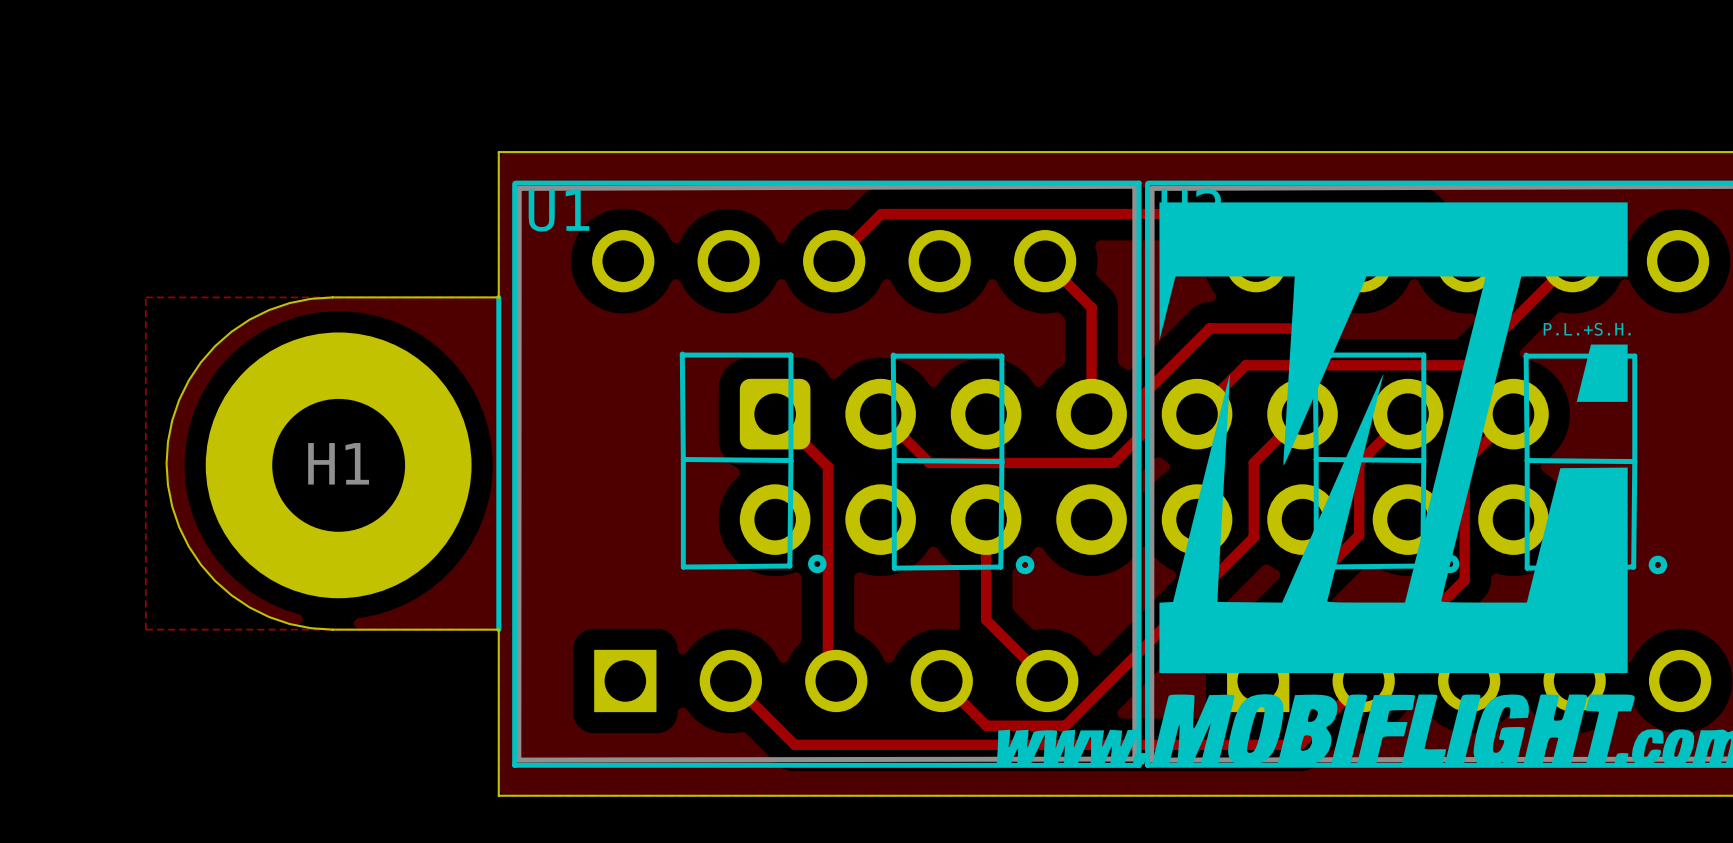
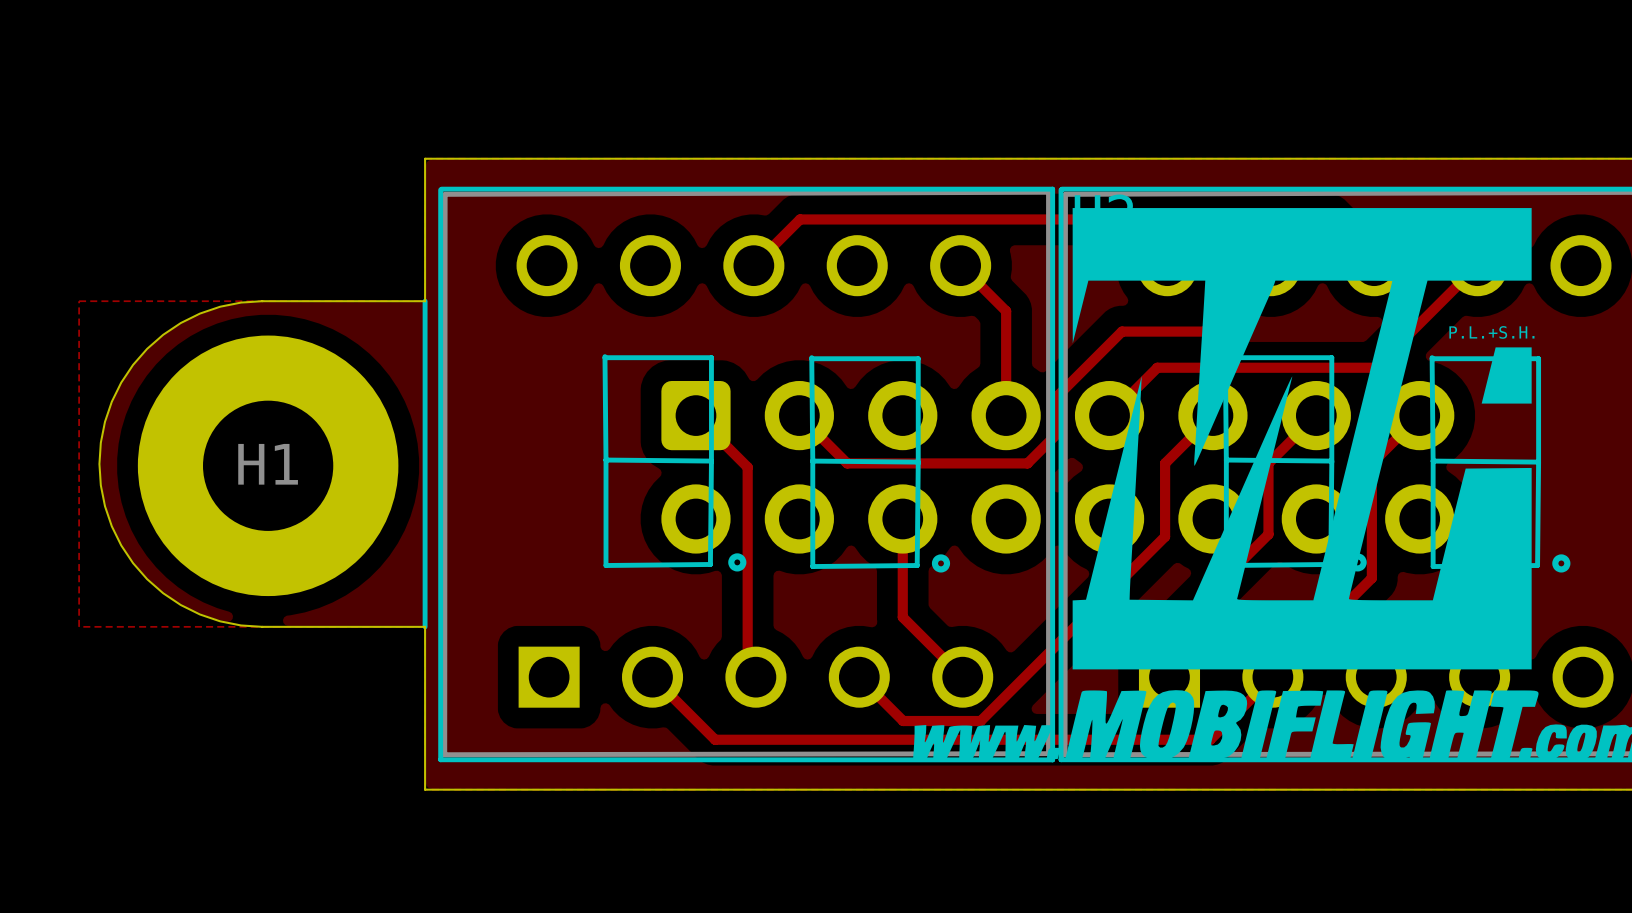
U1 name: U1 (558, 210) -> none

